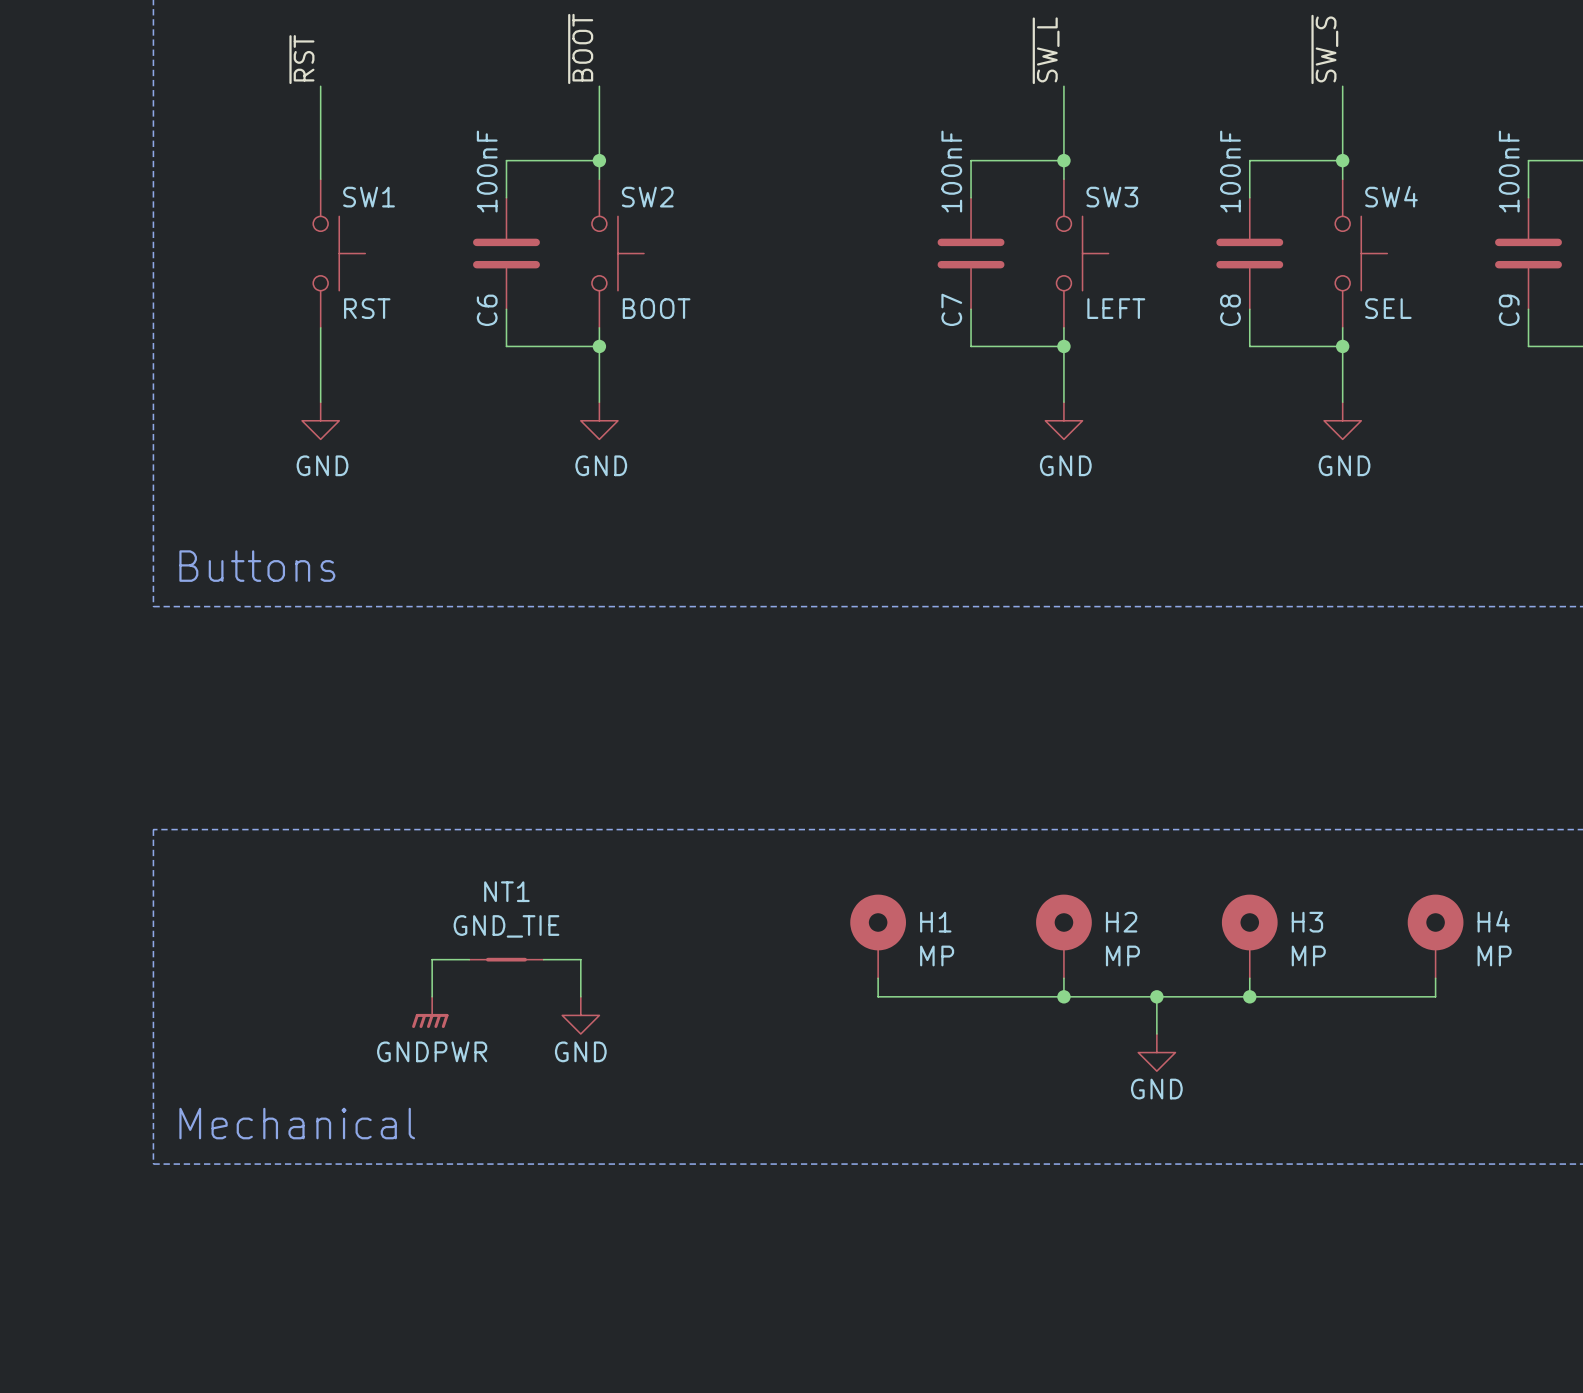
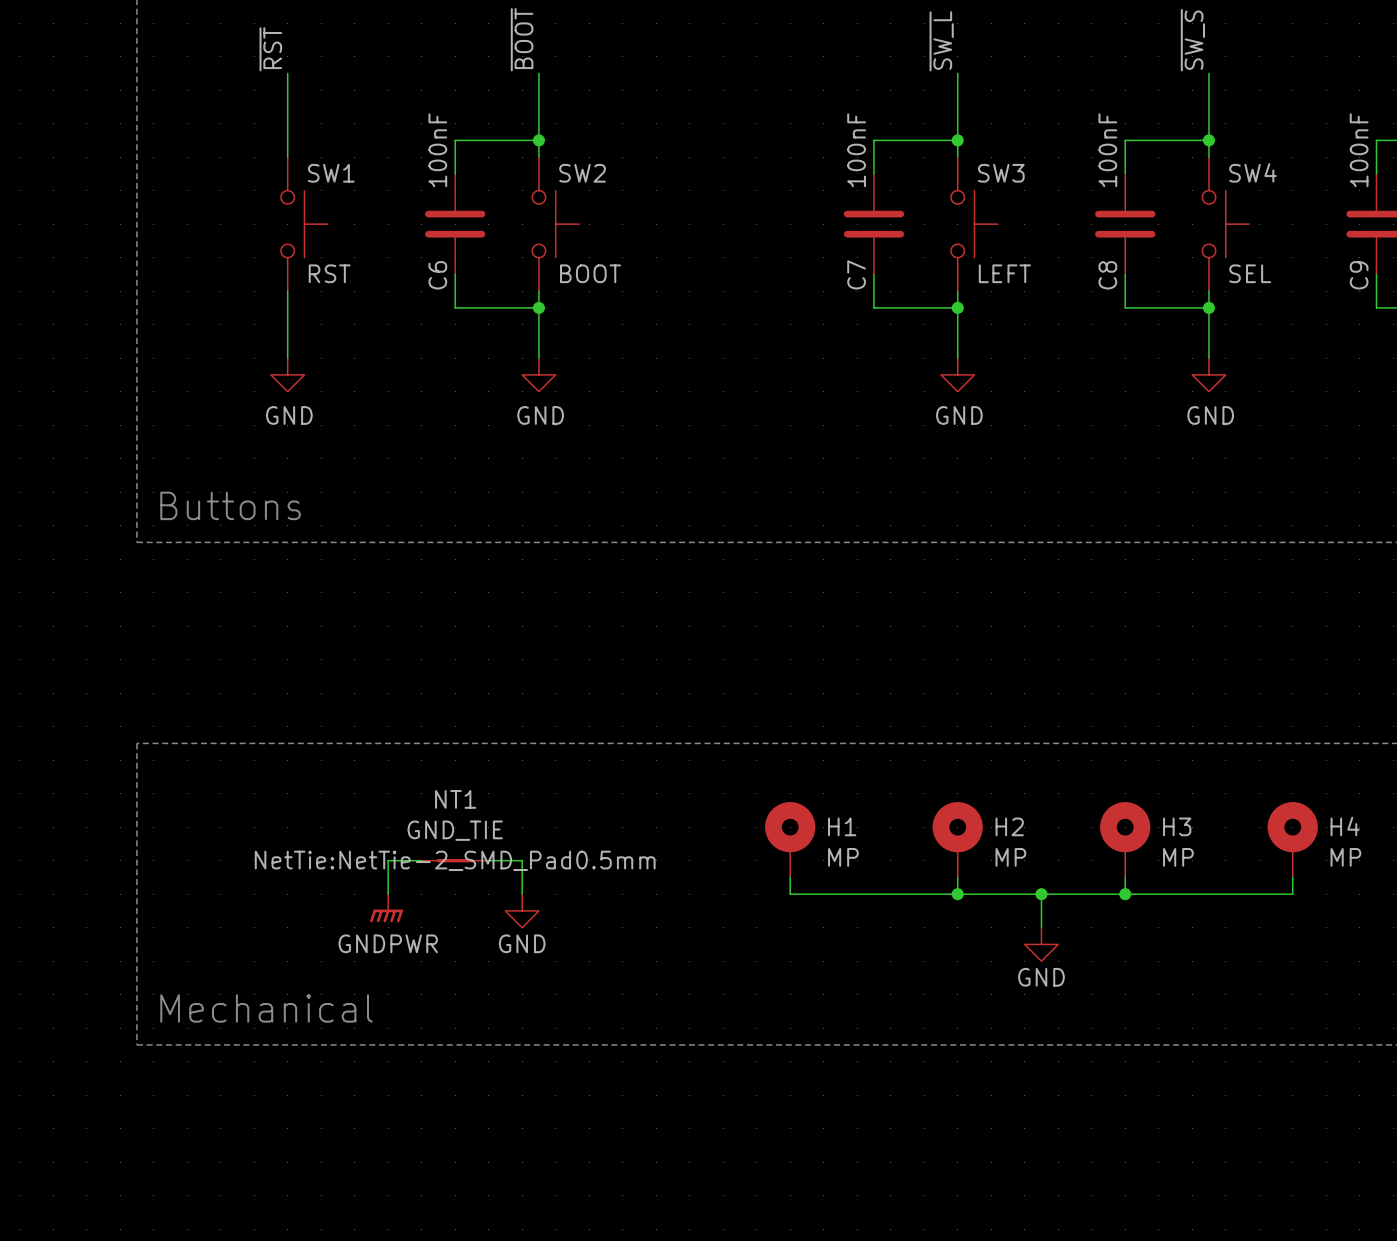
NT1 text: none -> NetTie:NetTie-2_SMD_Pad0.5mm (455, 860)

